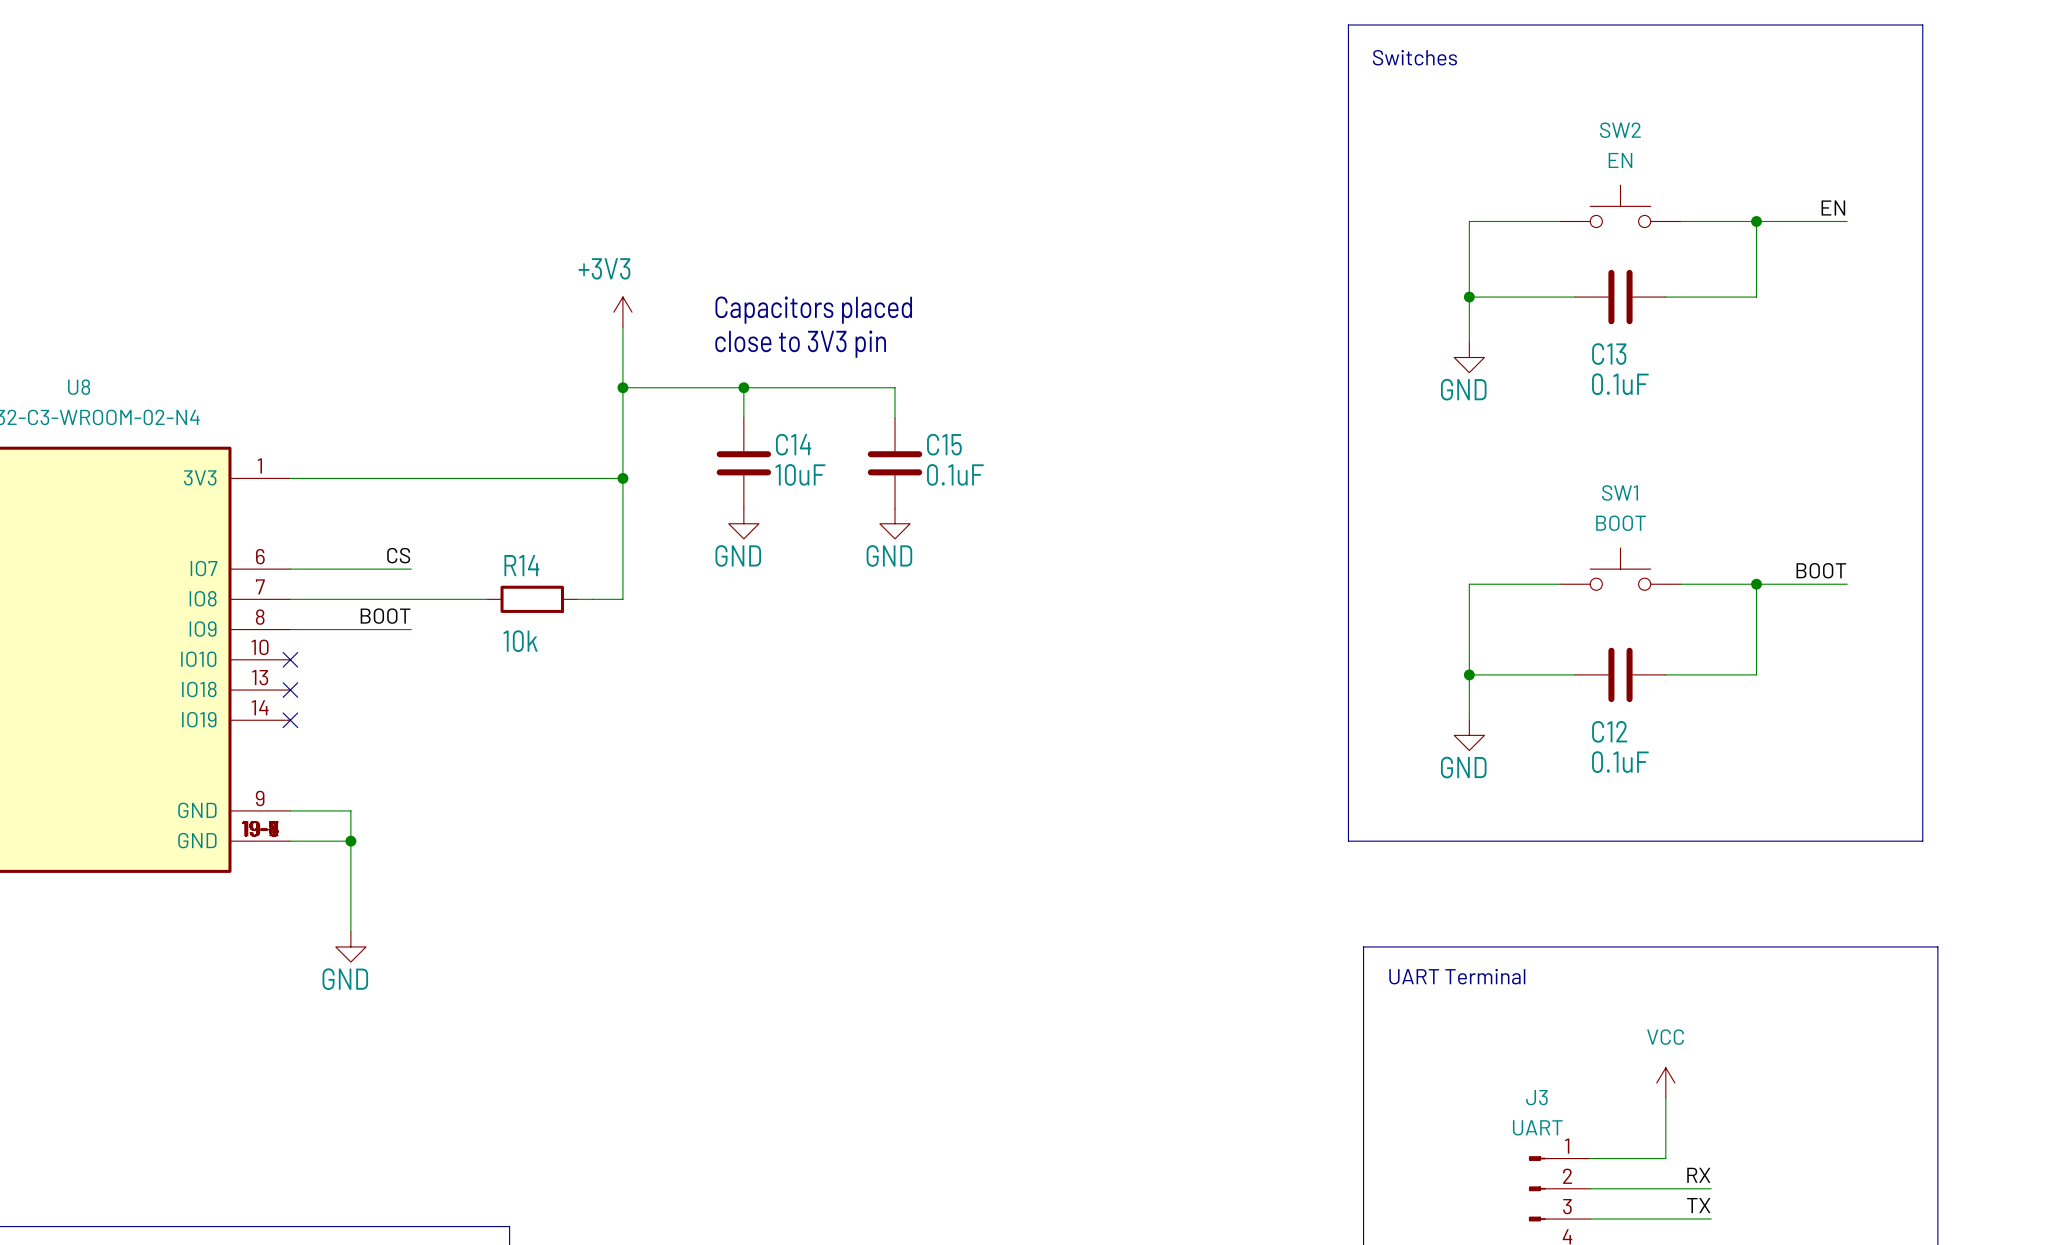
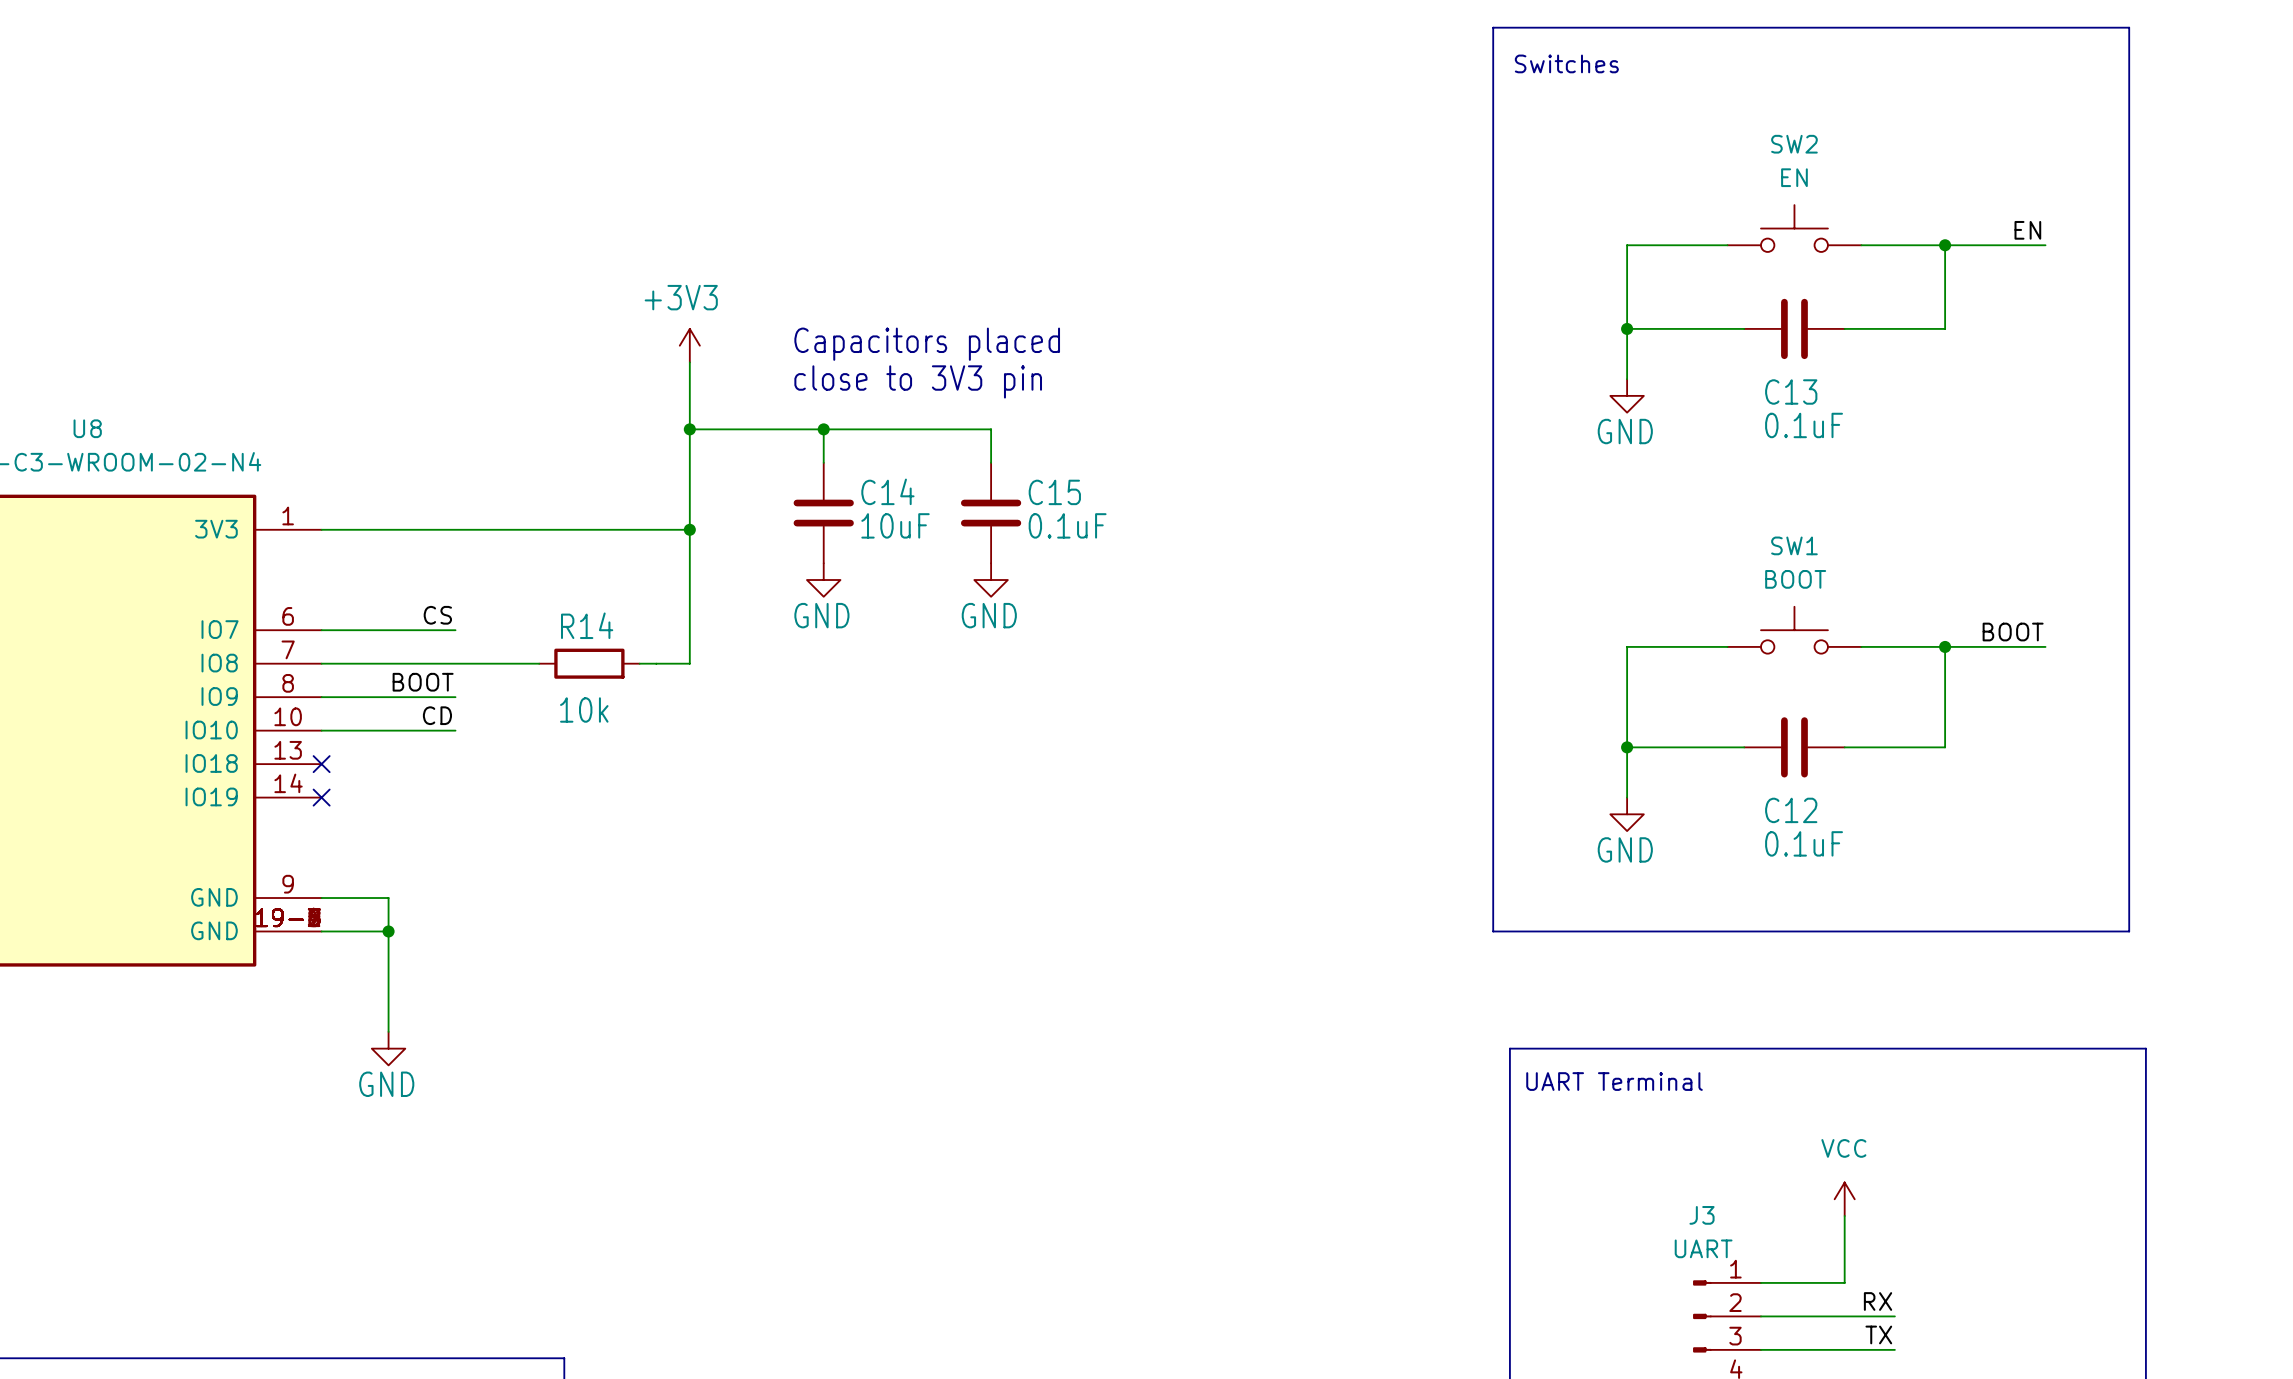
label: none -> CD (437, 715)
wire: none -> (321, 730) (455, 730)
no-connect mark: (290, 659) -> none

